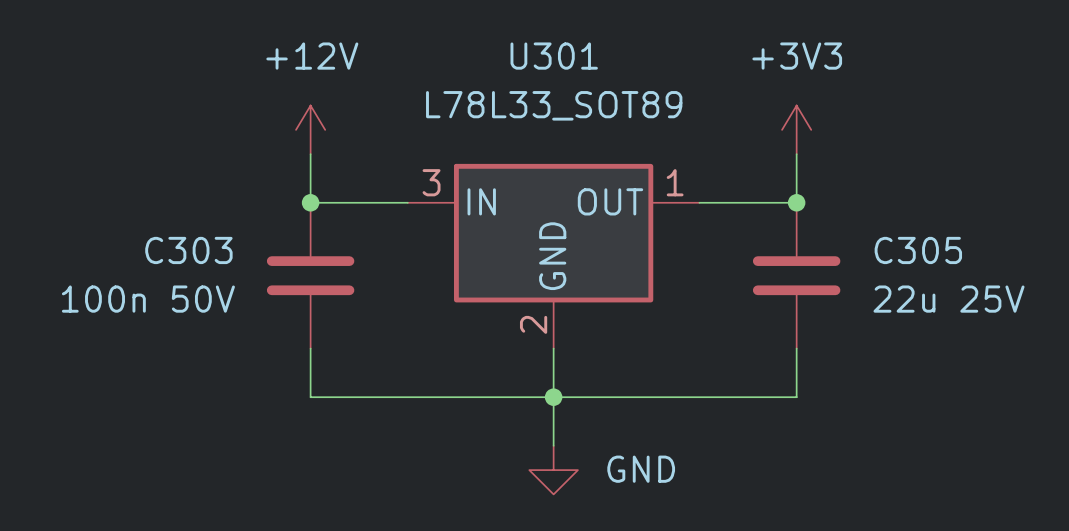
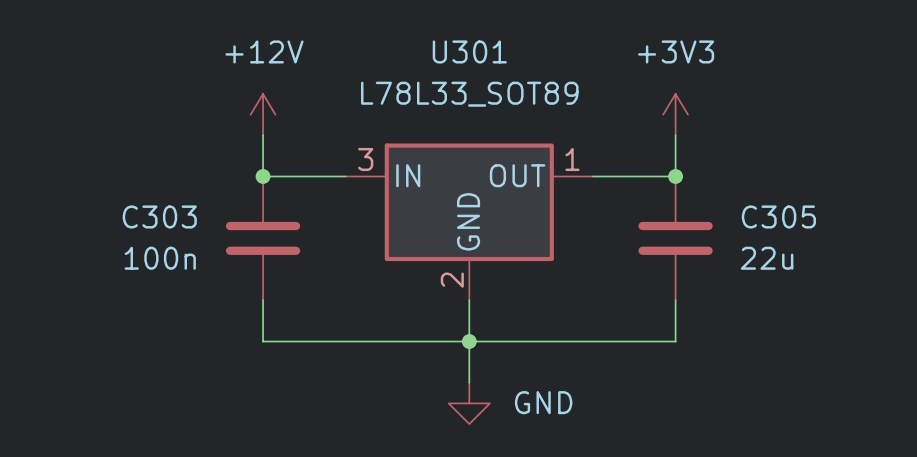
C303 value: 100n 50V (148, 299) -> 100n (160, 258)
C305 value: 22u 25V (949, 299) -> 22u (767, 258)

